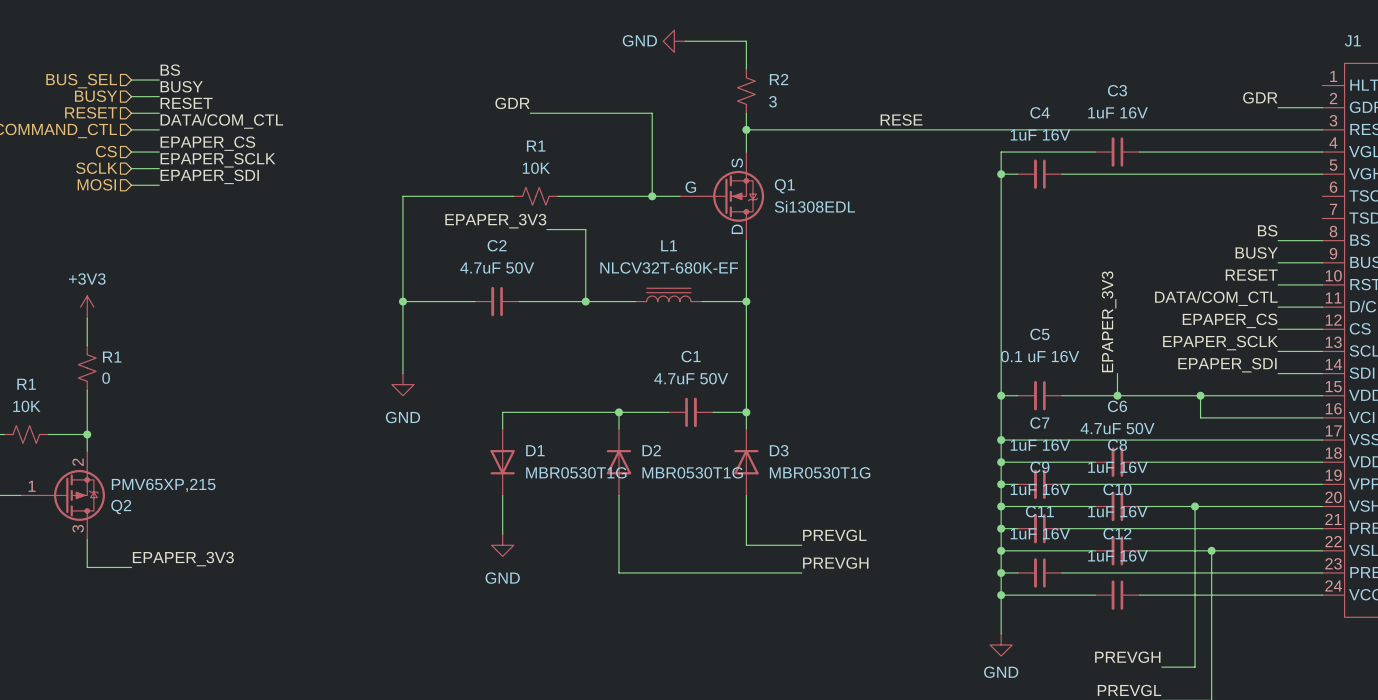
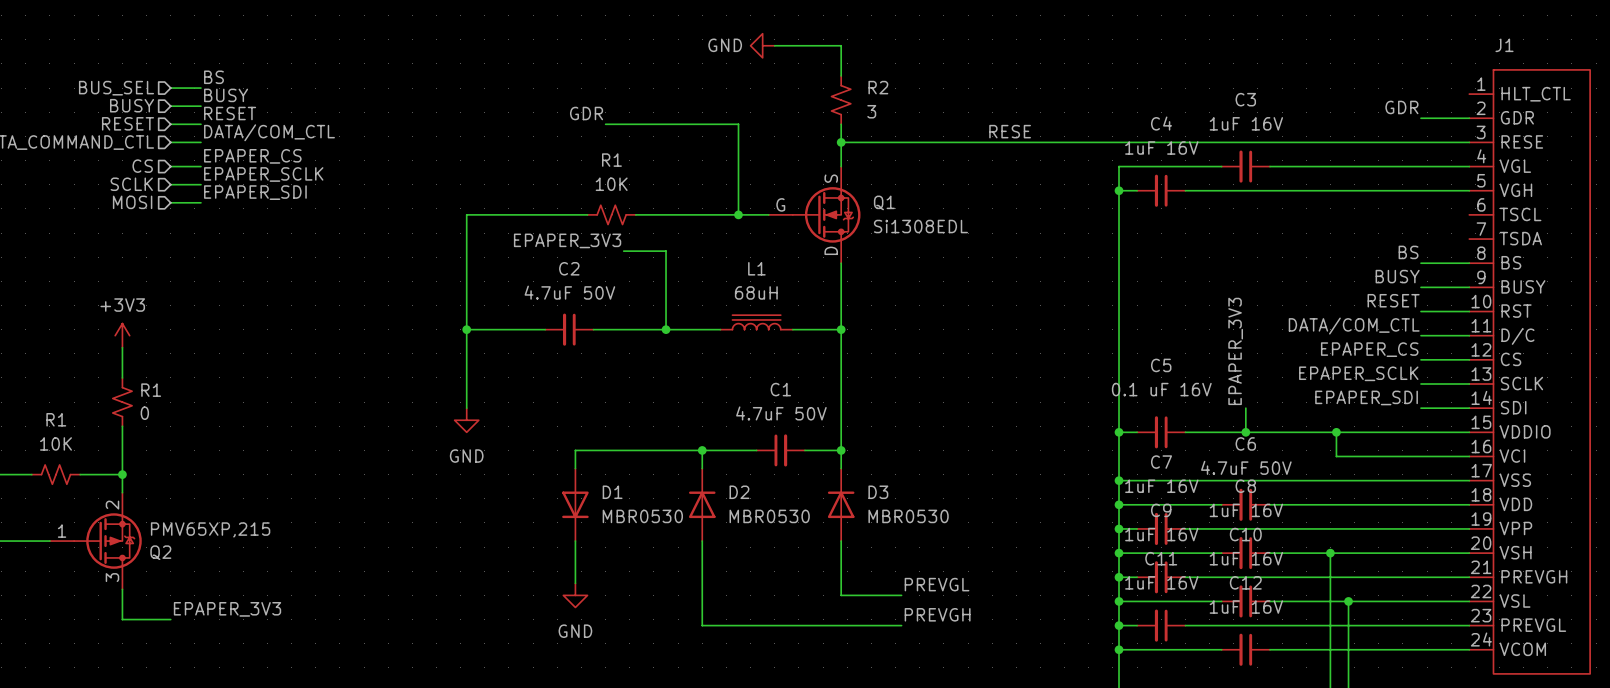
L1 value: NLCV32T-680K-EF (669, 267) -> 68uH (756, 292)
D1 value: MBR0530T1G (576, 472) -> MBR0530 (642, 516)
D2 value: MBR0530T1G (692, 472) -> MBR0530 (769, 516)
D3 value: MBR0530T1G (820, 472) -> MBR0530 (908, 516)

